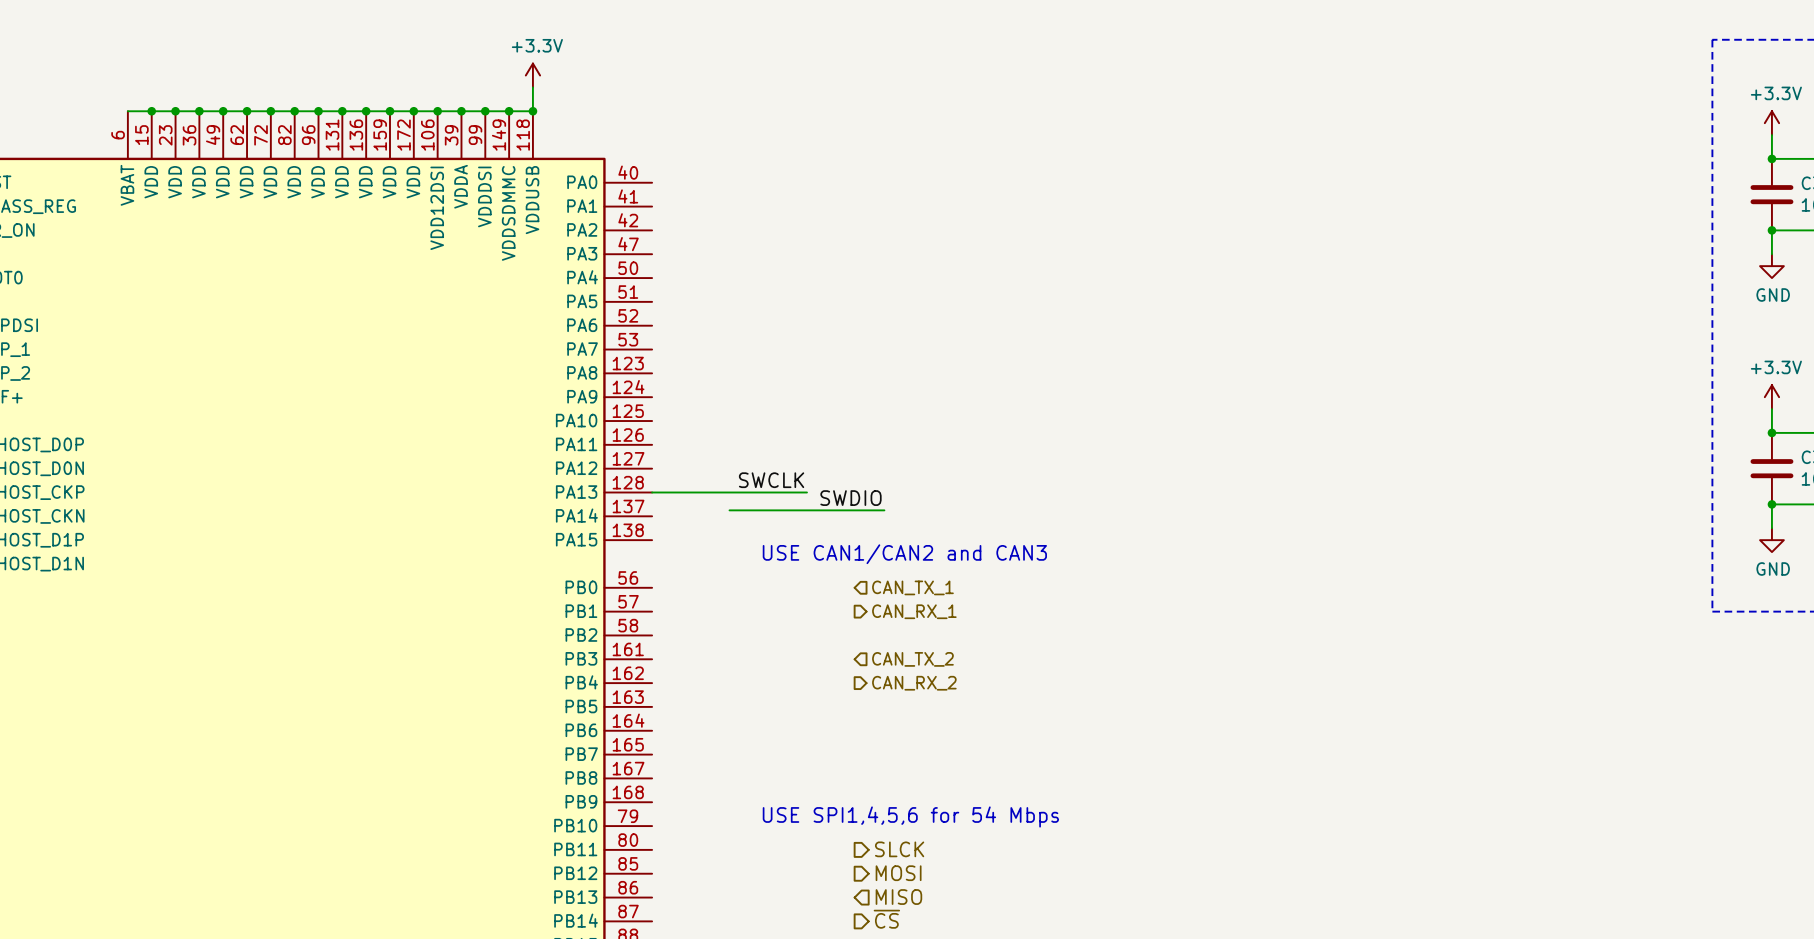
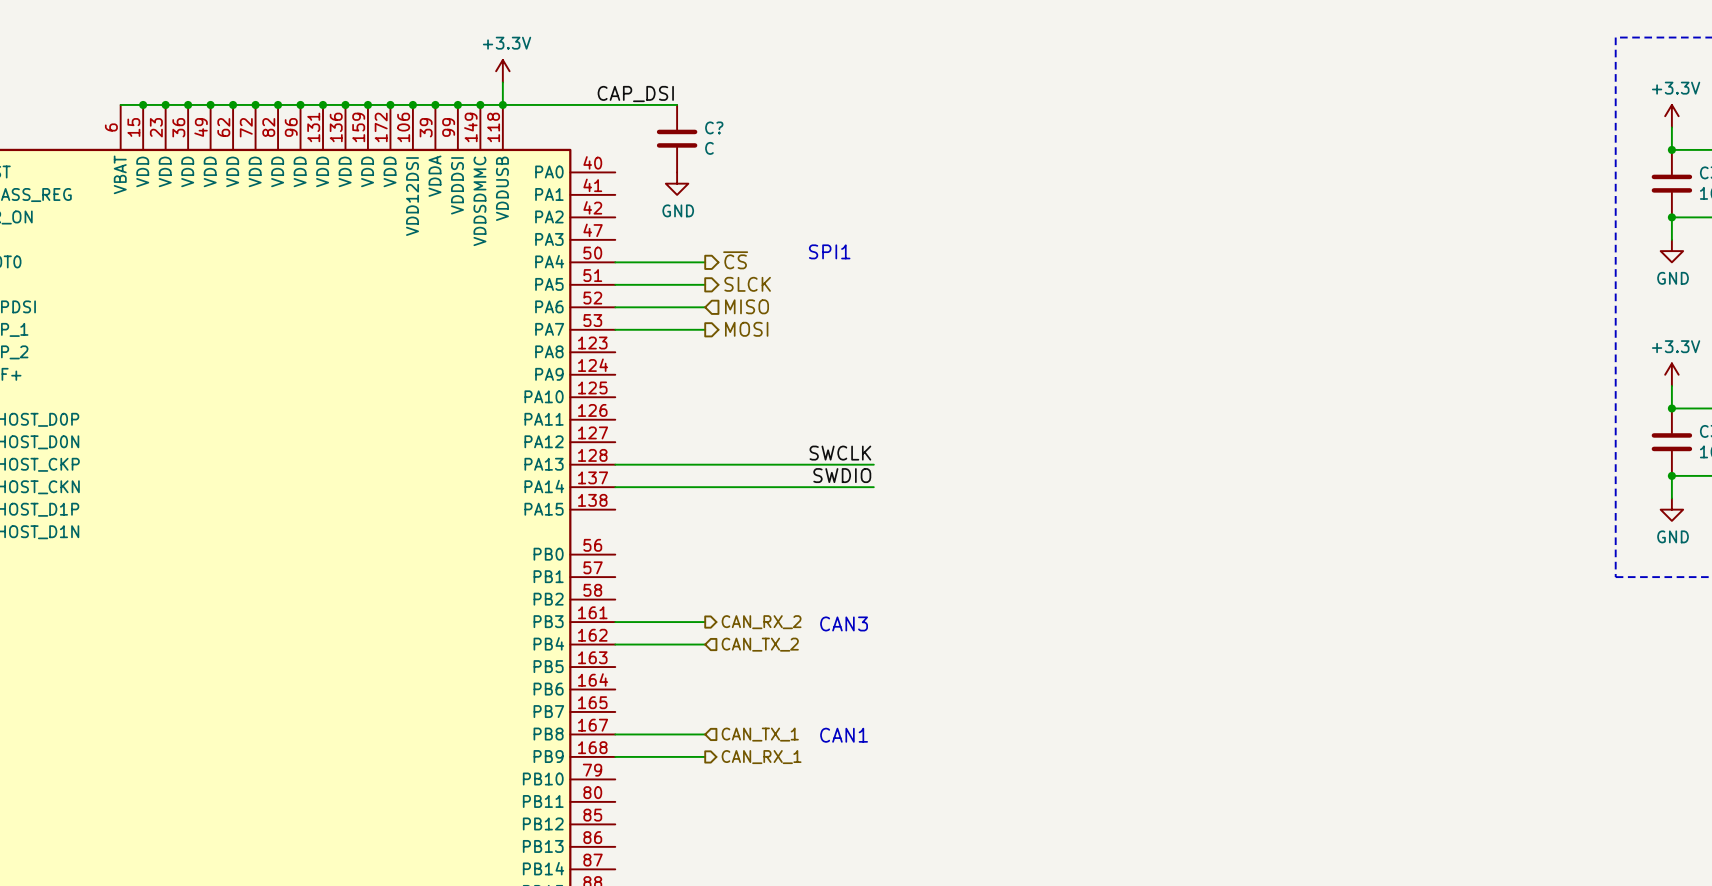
label: none -> CAP_DSI (635, 94)
wire: none -> (502, 104) (677, 104)
C?: none -> C (677, 138)
power symbol: none -> GND (677, 183)
text: none -> SPI1 (829, 251)
hierarchical label: none -> ~{CS} (735, 260)
wire: none -> (615, 262) (705, 262)
wire: none -> (615, 284) (705, 284)
hierarchical label: none -> SLCK (747, 284)
wire: none -> (615, 307) (705, 307)
hierarchical label: none -> MISO (747, 306)
wire: none -> (615, 329) (705, 329)
hierarchical label: none -> MOSI (746, 329)
label position: SWCLK (771, 480) -> SWCLK (840, 453)
wire: none -> (761, 464) (873, 464)
label position: SWDIO (850, 498) -> SWDIO (842, 475)
wire: (729, 510) (884, 510) -> none
wire: none -> (615, 487) (873, 487)
text: USE CAN1/CAN2 and CAN3 (904, 554) -> none
hierarchical label position: CAN_TX_1 (912, 587) -> CAN_TX_1 (760, 734)
hierarchical label position: CAN_RX_1 (914, 611) -> CAN_RX_1 (761, 757)
wire: none -> (615, 622) (705, 622)
hierarchical label position: CAN_TX_2 (912, 659) -> CAN_TX_2 (760, 644)
text: none -> CAN3 (844, 623)
wire: none -> (615, 644) (705, 644)
hierarchical label position: CAN_RX_2 (914, 683) -> CAN_RX_2 (761, 622)
wire: none -> (615, 734) (705, 734)
text: none -> CAN1 (844, 735)
wire: none -> (615, 756) (705, 756)
text: USE SPI1,4,5,6 for 54 Mbps (910, 816) -> none
hierarchical label: SLCK (899, 849) -> none
hierarchical label: MOSI (898, 873) -> none
hierarchical label: MISO (898, 897) -> none
hierarchical label: ~{CS} (886, 919) -> none

